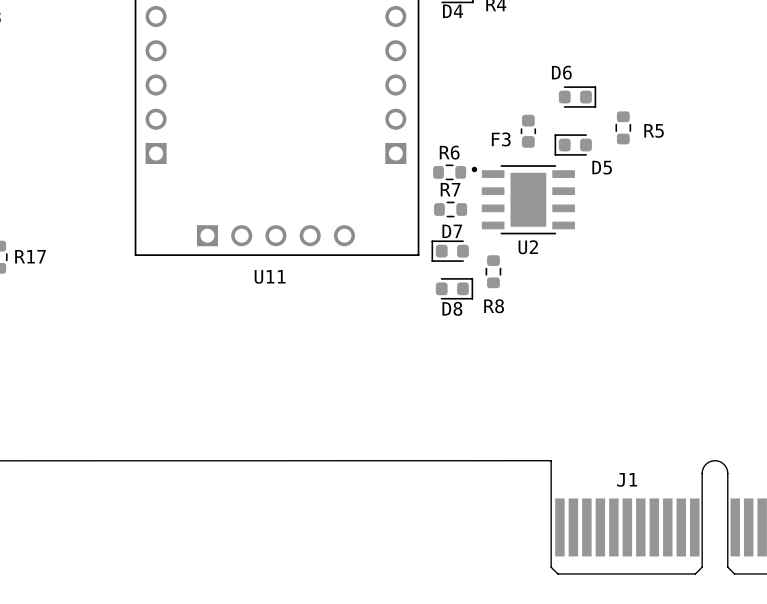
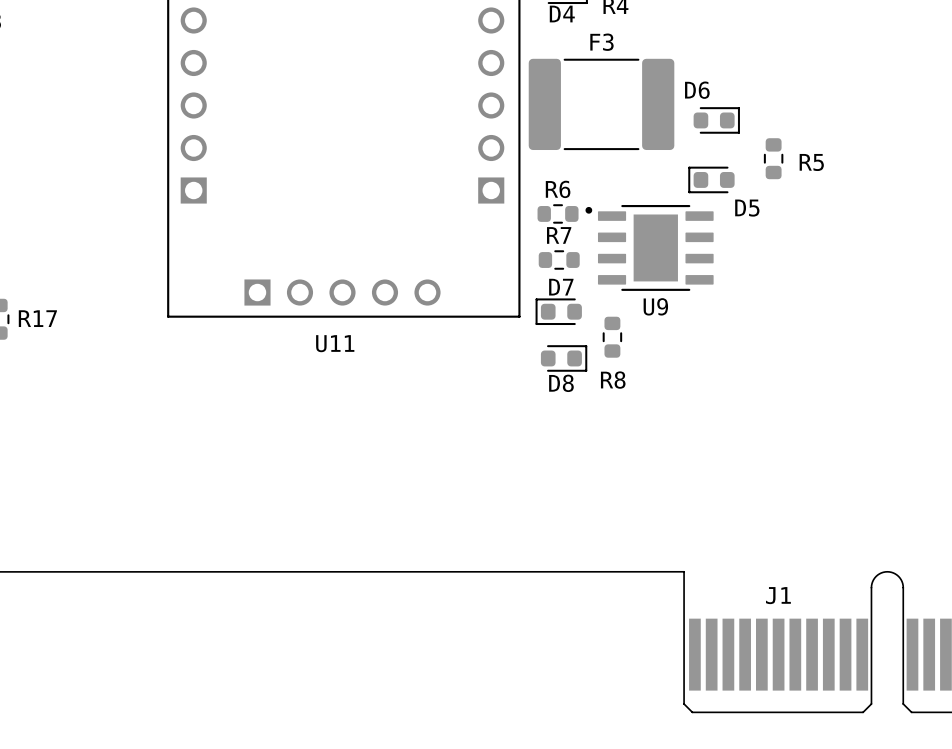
F3 footprint: [520, 114, 537, 148] -> [528, 58, 675, 151]
F3 name position: F3 (501, 139) -> F3 (601, 42)
U2 name: U2 (528, 247) -> U9 (655, 306)

